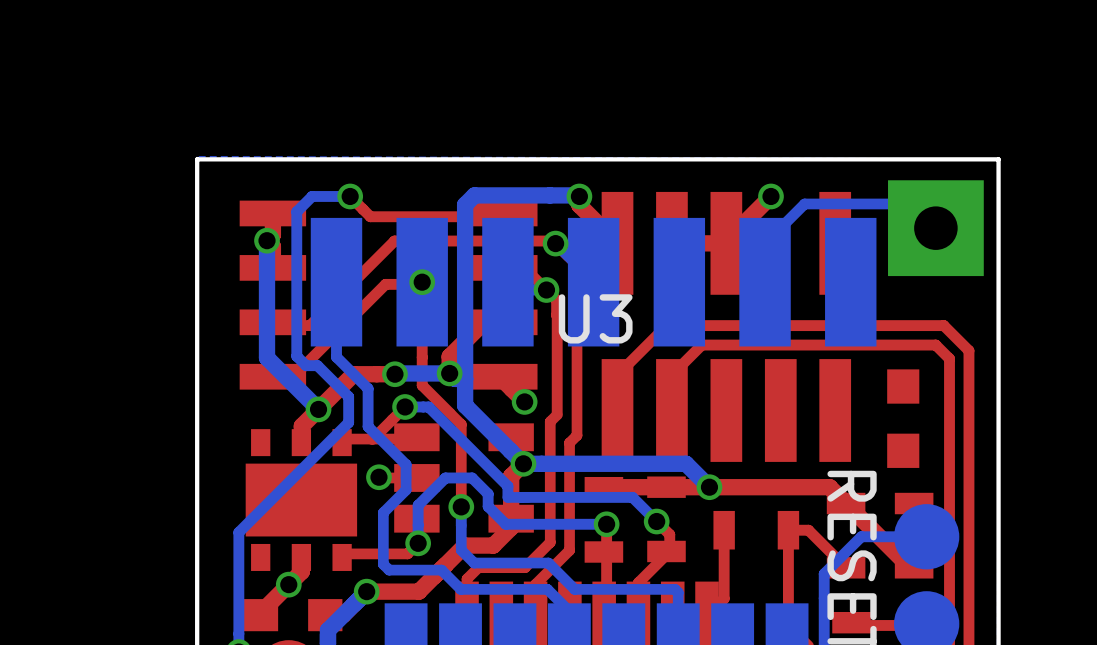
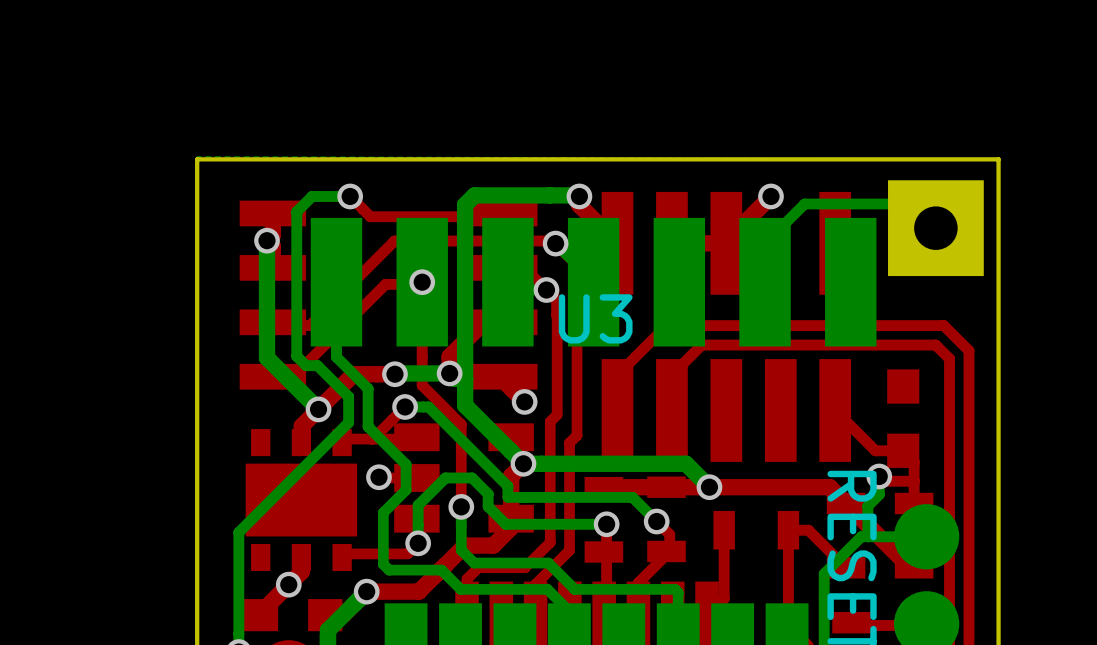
top track: none -> (835, 410) (875, 450) (903, 450) (914, 461) (914, 503)
top track: none -> (879, 476) (884, 481) (914, 481)
bottom track: none -> (879, 476) (879, 494) (867, 506) (867, 536)
via: none -> (879, 476)

